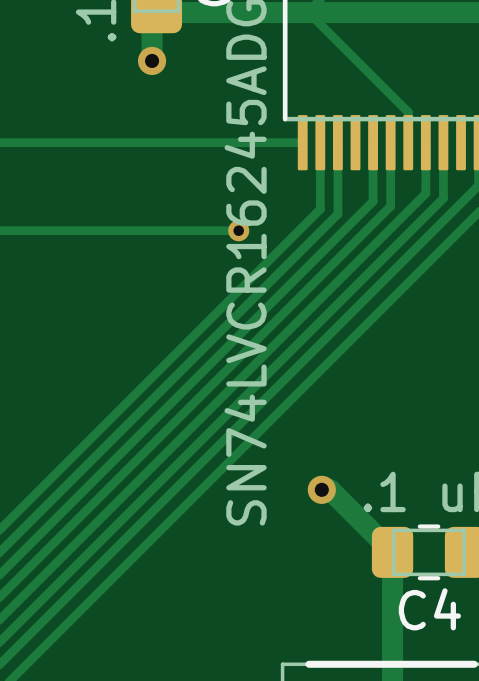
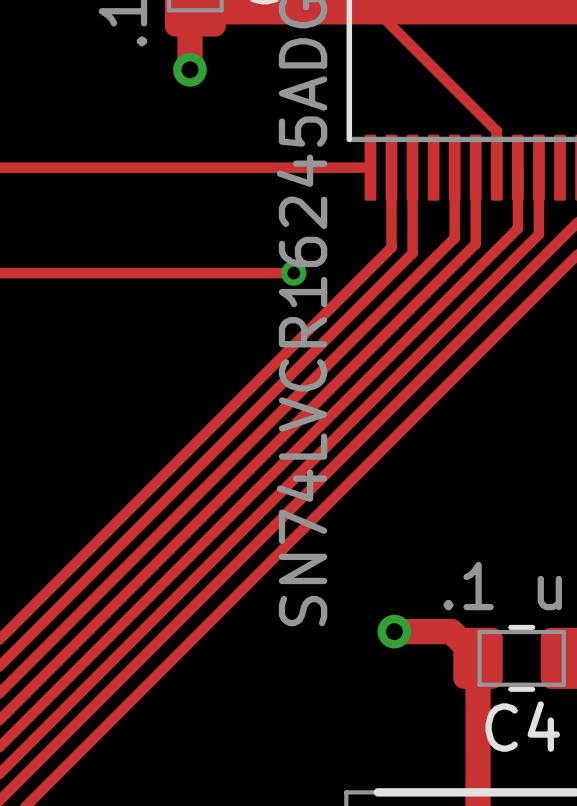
track: (321, 489) (330, 489) (370, 530) -> (394, 631) (451, 631)
via position: (321, 489) -> (394, 631)

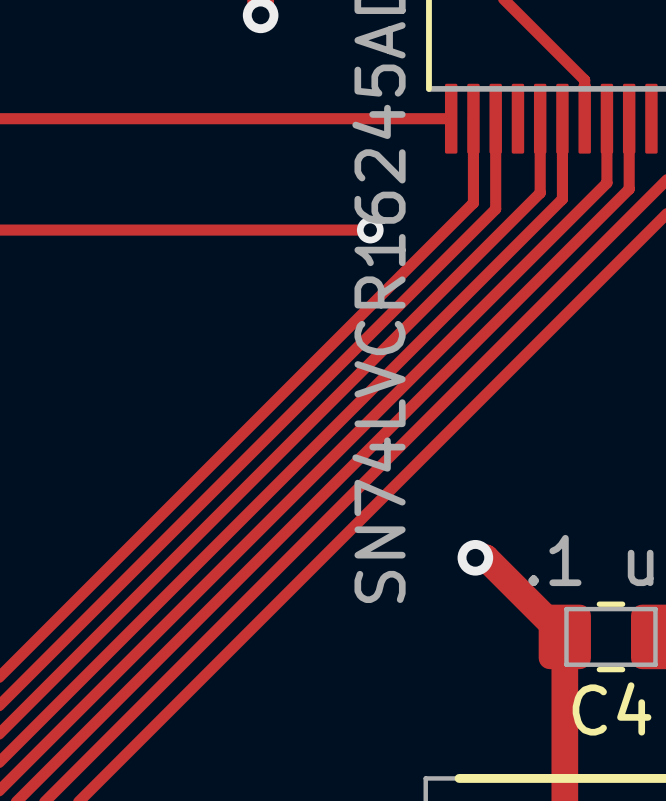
track: (394, 631) (451, 631) -> (475, 557) (485, 557) (536, 608)
via position: (394, 631) -> (475, 557)

